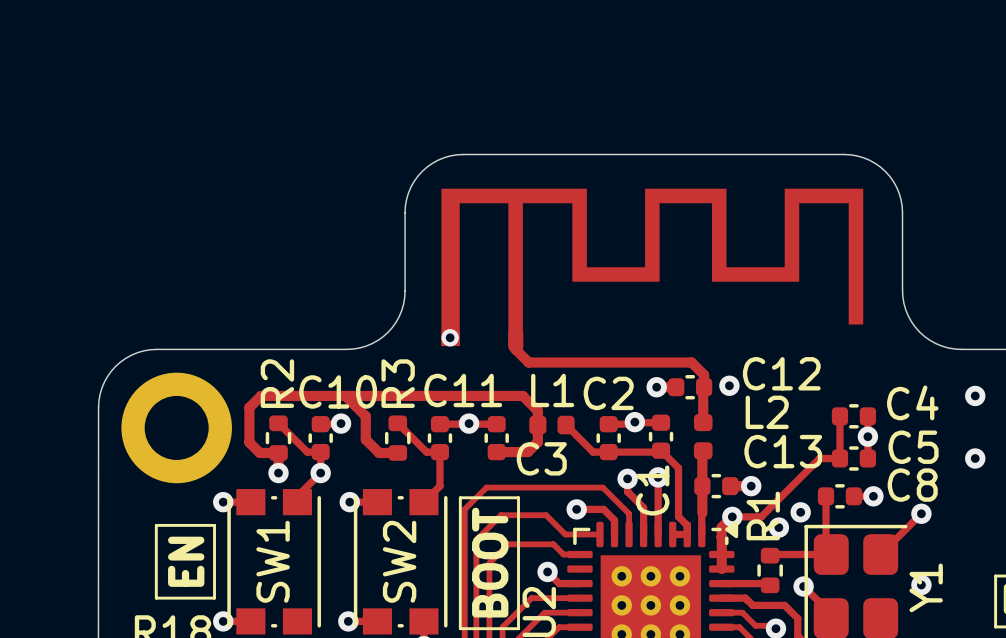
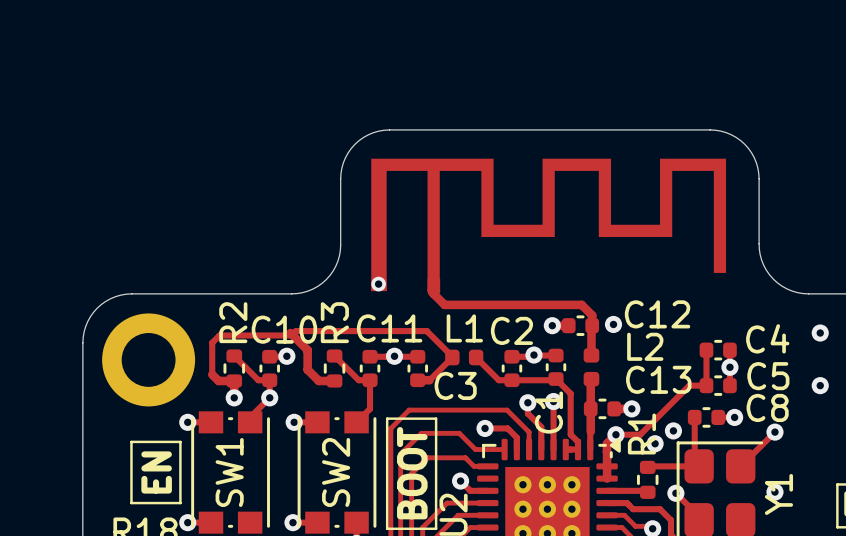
track: none -> (452, 357) (429, 380)
track: (252, 445) (249, 442) (249, 407) (261, 395) (522, 395) (537, 410) (537, 442) (527, 452) (510, 452) -> (212, 374) (212, 342) (219, 335) (291, 335) (296, 331) (426, 331) (452, 356)

